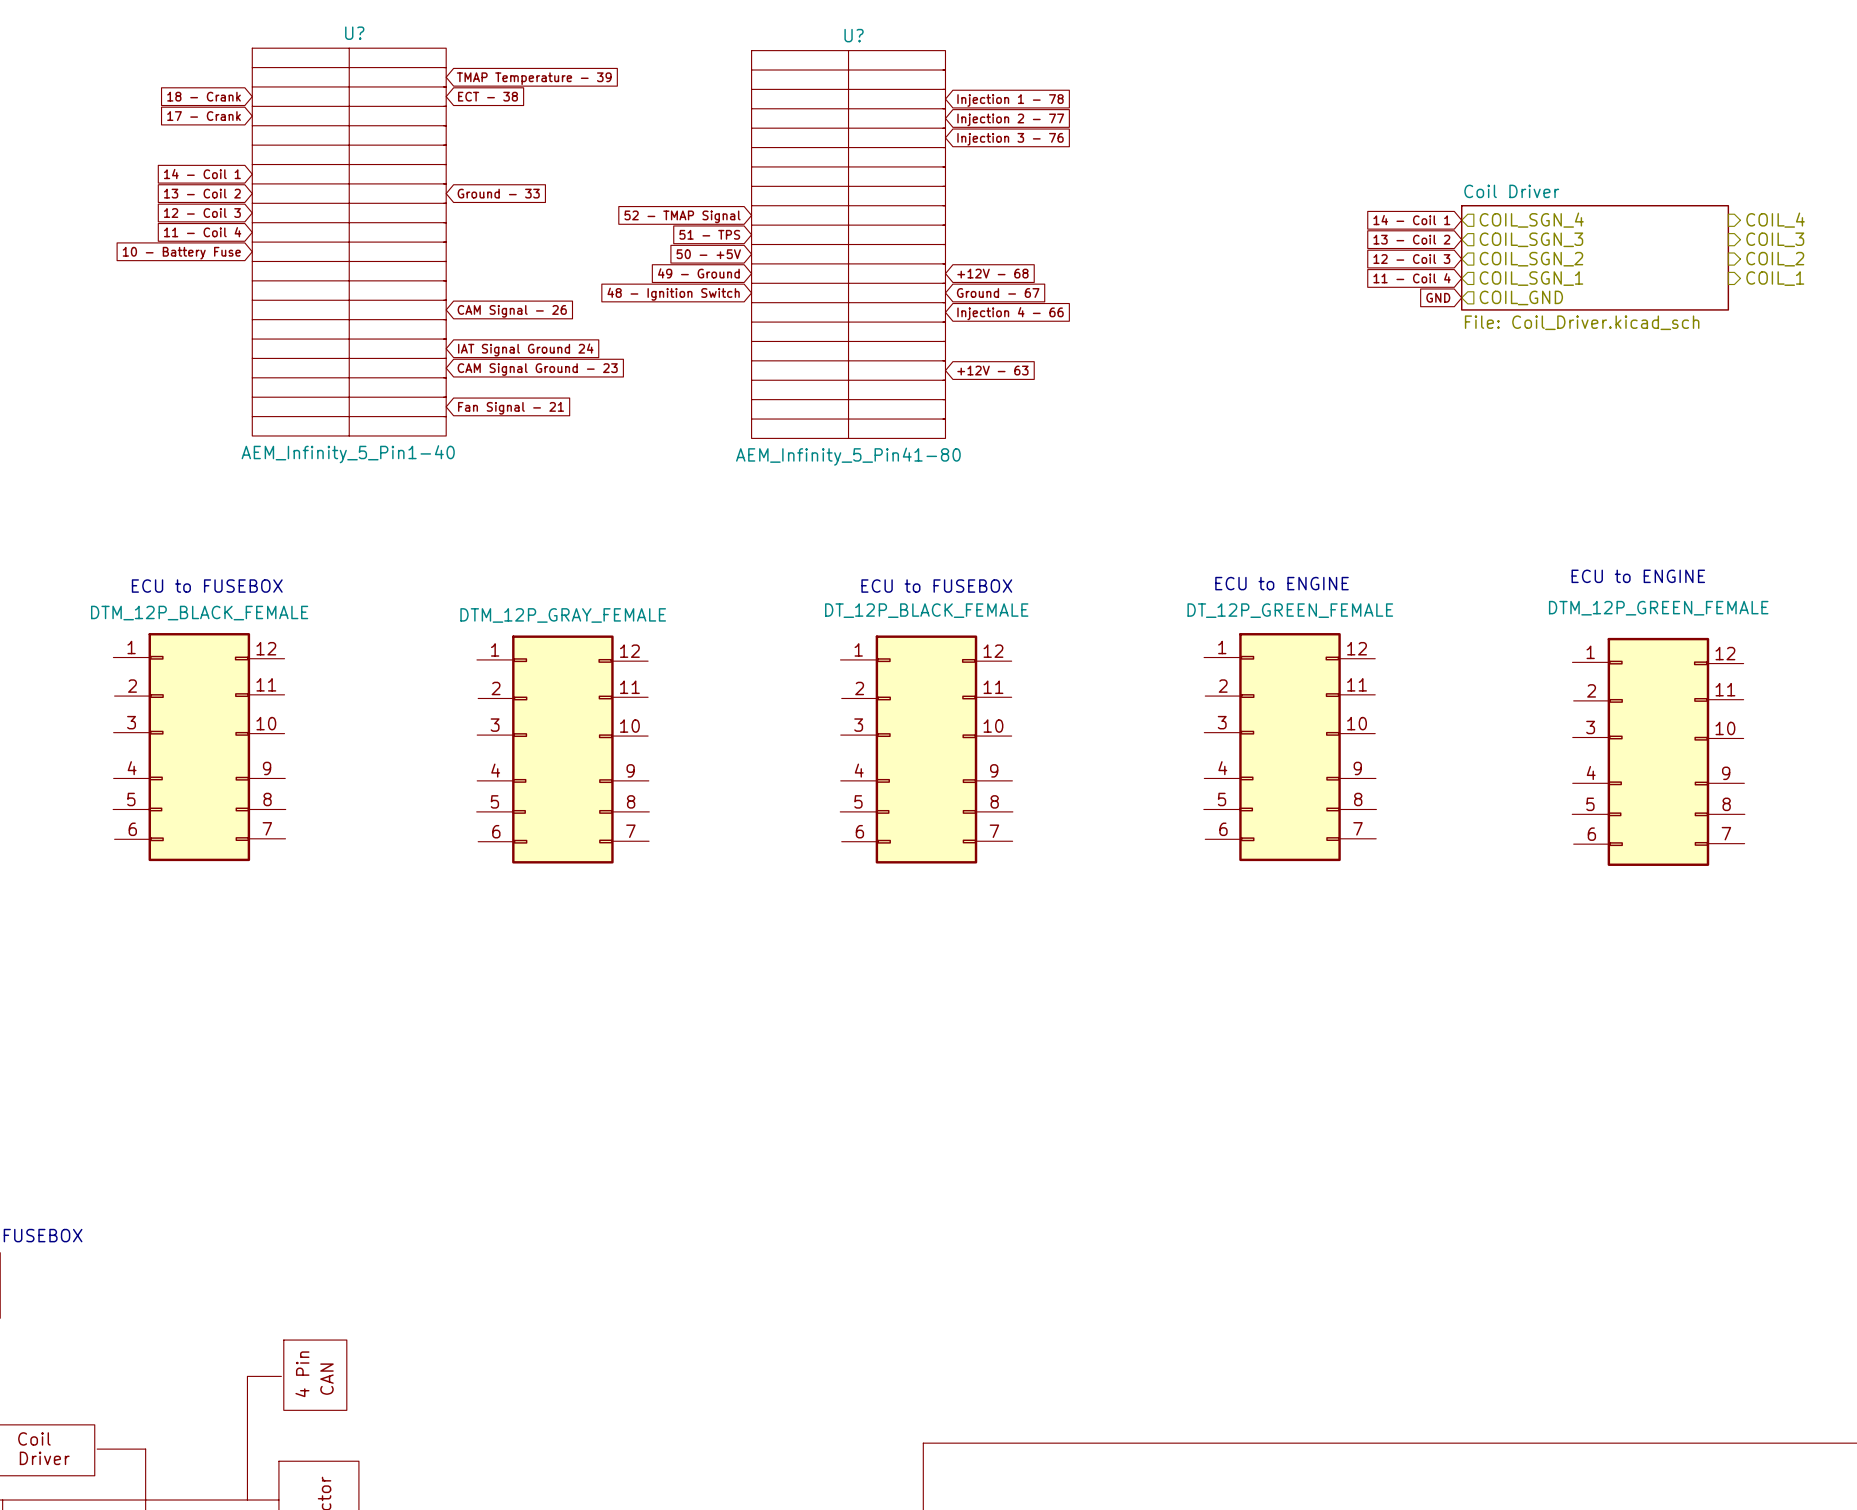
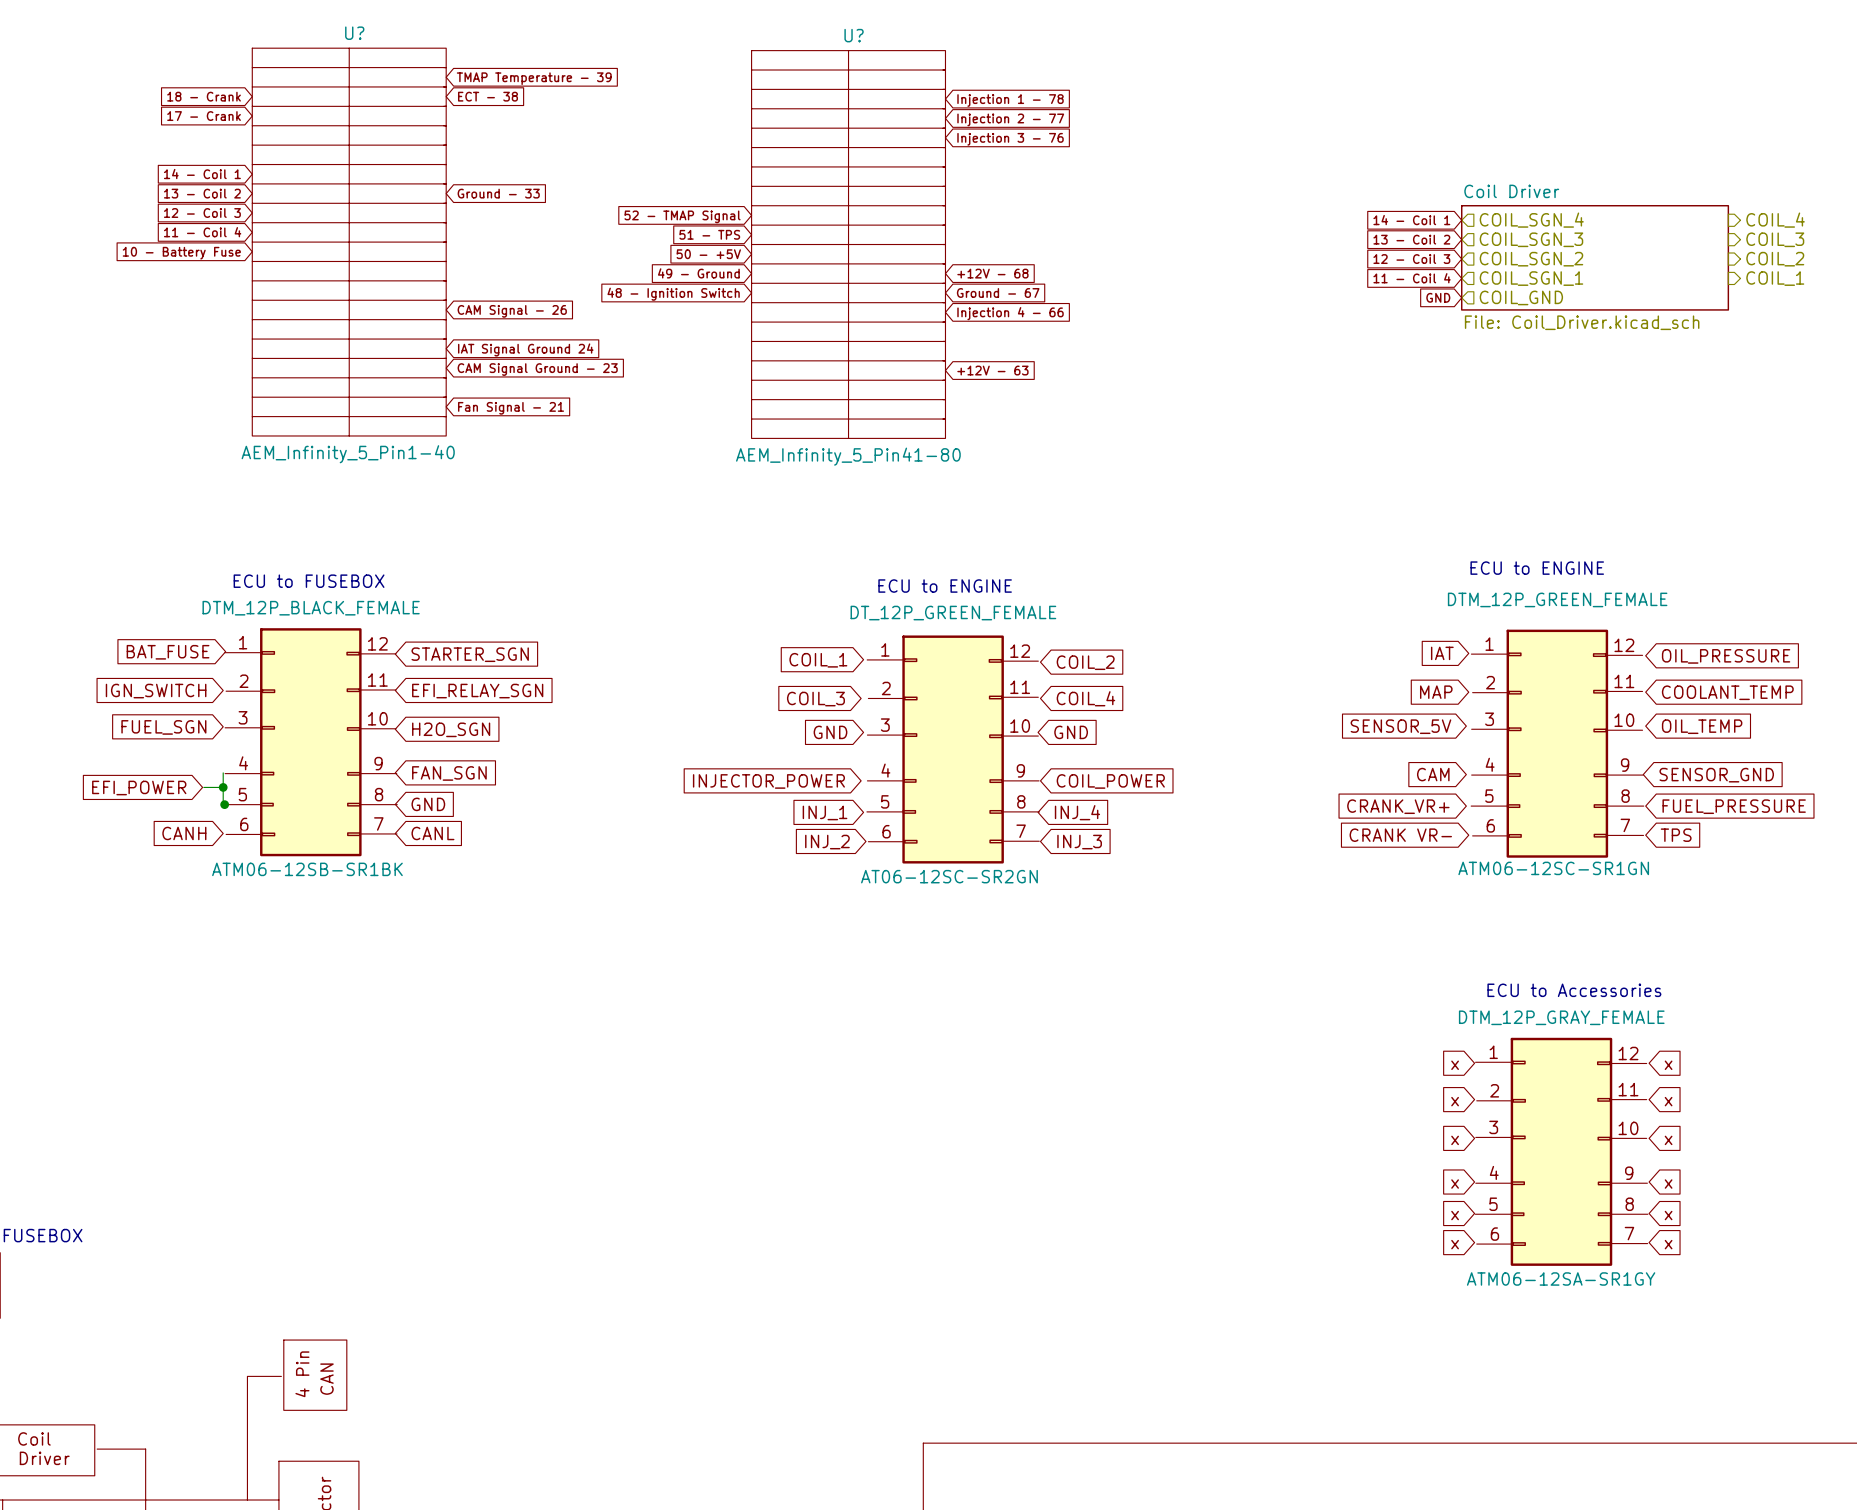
text position: ECU to ENGINE (1638, 576) -> ECU to ENGINE (1537, 568)
text: ECU to ENGINE (1282, 583) -> none
text position: ECU to FUSEBOX (207, 586) -> ECU to FUSEBOX (309, 581)
text: ECU to FUSEBOX (936, 586) -> none
text: none -> ECU to ENGINE (945, 586)
global label: none -> BAT_FUSE (168, 652)
global label: none -> IAT (1442, 653)
global label: none -> STARTER_SGN (470, 654)
global label: none -> OIL_PRESSURE (1726, 656)
global label: none -> COIL_1 (818, 660)
global label: none -> COIL_2 (1085, 662)
global label: none -> IGN_SWITCH (156, 691)
global label: none -> EFI_RELAY_SGN (477, 691)
global label: none -> MAP (1436, 692)
global label: none -> COOLANT_TEMP (1727, 692)
global label: none -> COIL_4 (1085, 698)
global label: none -> COIL_3 (815, 699)
global label: none -> SENSOR_5V (1400, 726)
global label: none -> OIL_TEMP (1702, 726)
global label: none -> FUEL_SGN (163, 727)
global label: none -> H2O_SGN (451, 729)
global label: none -> GND (830, 732)
global label: none -> GND (1071, 732)
part: none -> DTM_12P_BLACK_FEMALE (310, 742)
part: none -> DTM_12P_GREEN_FEMALE (1557, 743)
part: DTM_12P_BLACK_FEMALE (199, 747) -> none
part: DT_12P_GREEN_FEMALE (1290, 747) -> none
part: DTM_12P_GRAY_FEMALE (563, 749) -> none
part: DT_12P_BLACK_FEMALE (926, 749) -> none
part: none -> DT_12P_GREEN_FEMALE (953, 749)
part: DTM_12P_GREEN_FEMALE (1658, 751) -> none
global label: none -> FAN_SGN (449, 773)
global label: none -> CAM (1433, 774)
global label: none -> SENSOR_GND (1716, 775)
global label: none -> INJECTOR_POWER (768, 781)
global label: none -> COIL_POWER (1110, 781)
junction: none -> (223, 787)
global label: none -> EFI_POWER (139, 788)
junction: none -> (224, 804)
global label: none -> GND (428, 804)
global label: none -> CRANK_VR+ (1398, 806)
global label: none -> FUEL_PRESSURE (1734, 806)
global label: none -> INJ_1 (825, 812)
global label: none -> INJ_4 (1077, 812)
global label: none -> CANH (184, 833)
global label: none -> CANL (432, 833)
global label: none -> CRANK VR- (1400, 835)
global label: none -> TPS (1676, 835)
global label: none -> INJ_2 (827, 842)
global label: none -> INJ_3 (1079, 842)
text: none -> ECU to Accessories (1574, 990)
global label: none -> x (1455, 1065)
global label: none -> x (1668, 1065)
global label: none -> x (1455, 1101)
global label: none -> x (1668, 1101)
global label: none -> x (1455, 1140)
global label: none -> x (1668, 1140)
part: none -> DTM_12P_GRAY_FEMALE (1561, 1151)
global label: none -> x (1455, 1184)
global label: none -> x (1668, 1184)
global label: none -> x (1455, 1215)
global label: none -> x (1668, 1215)
global label: none -> x (1455, 1244)
global label: none -> x (1668, 1244)

